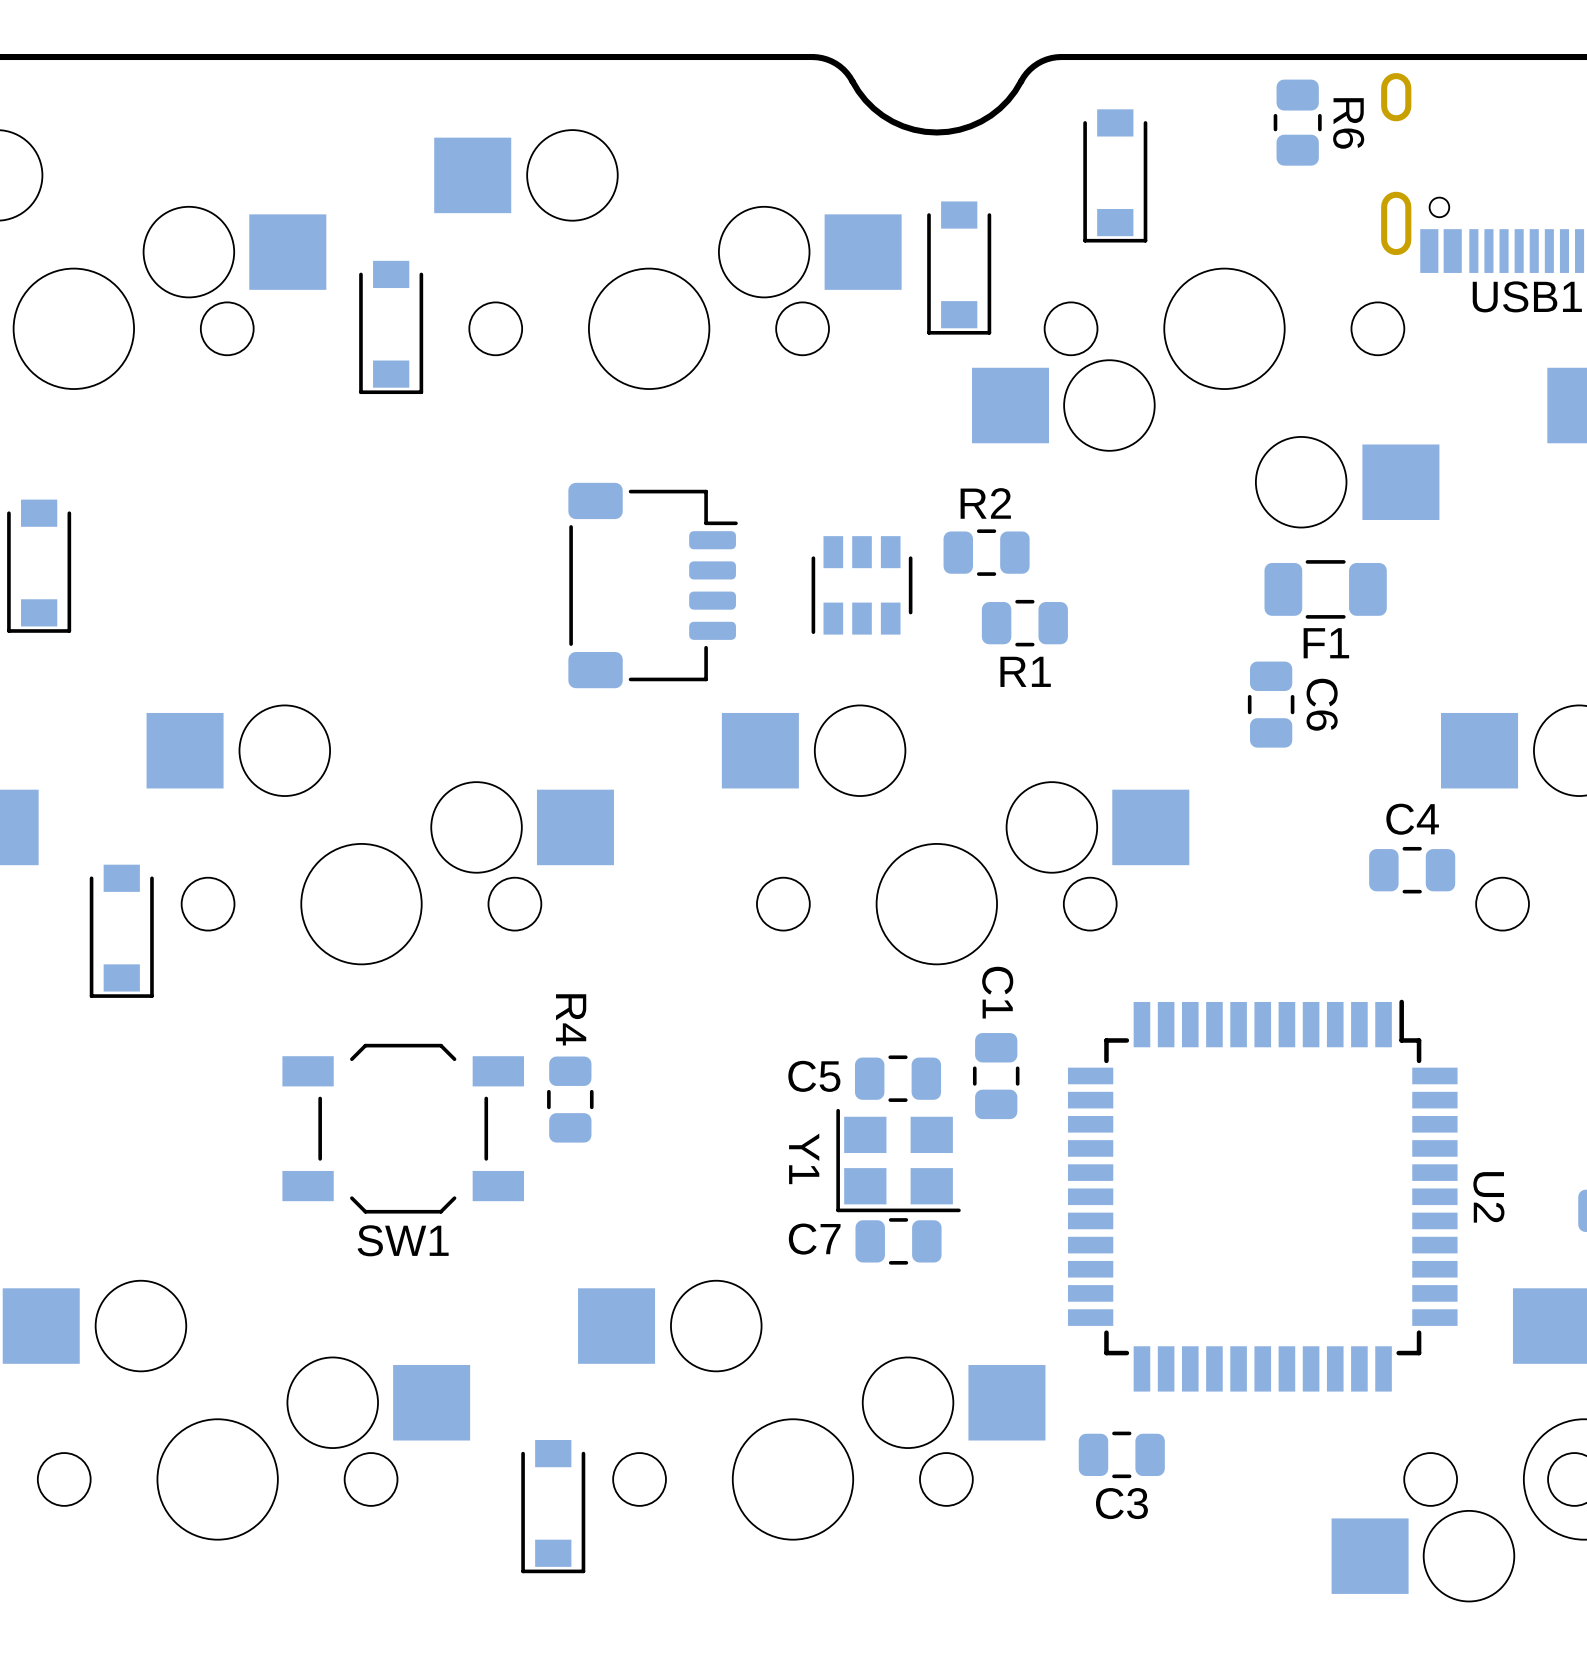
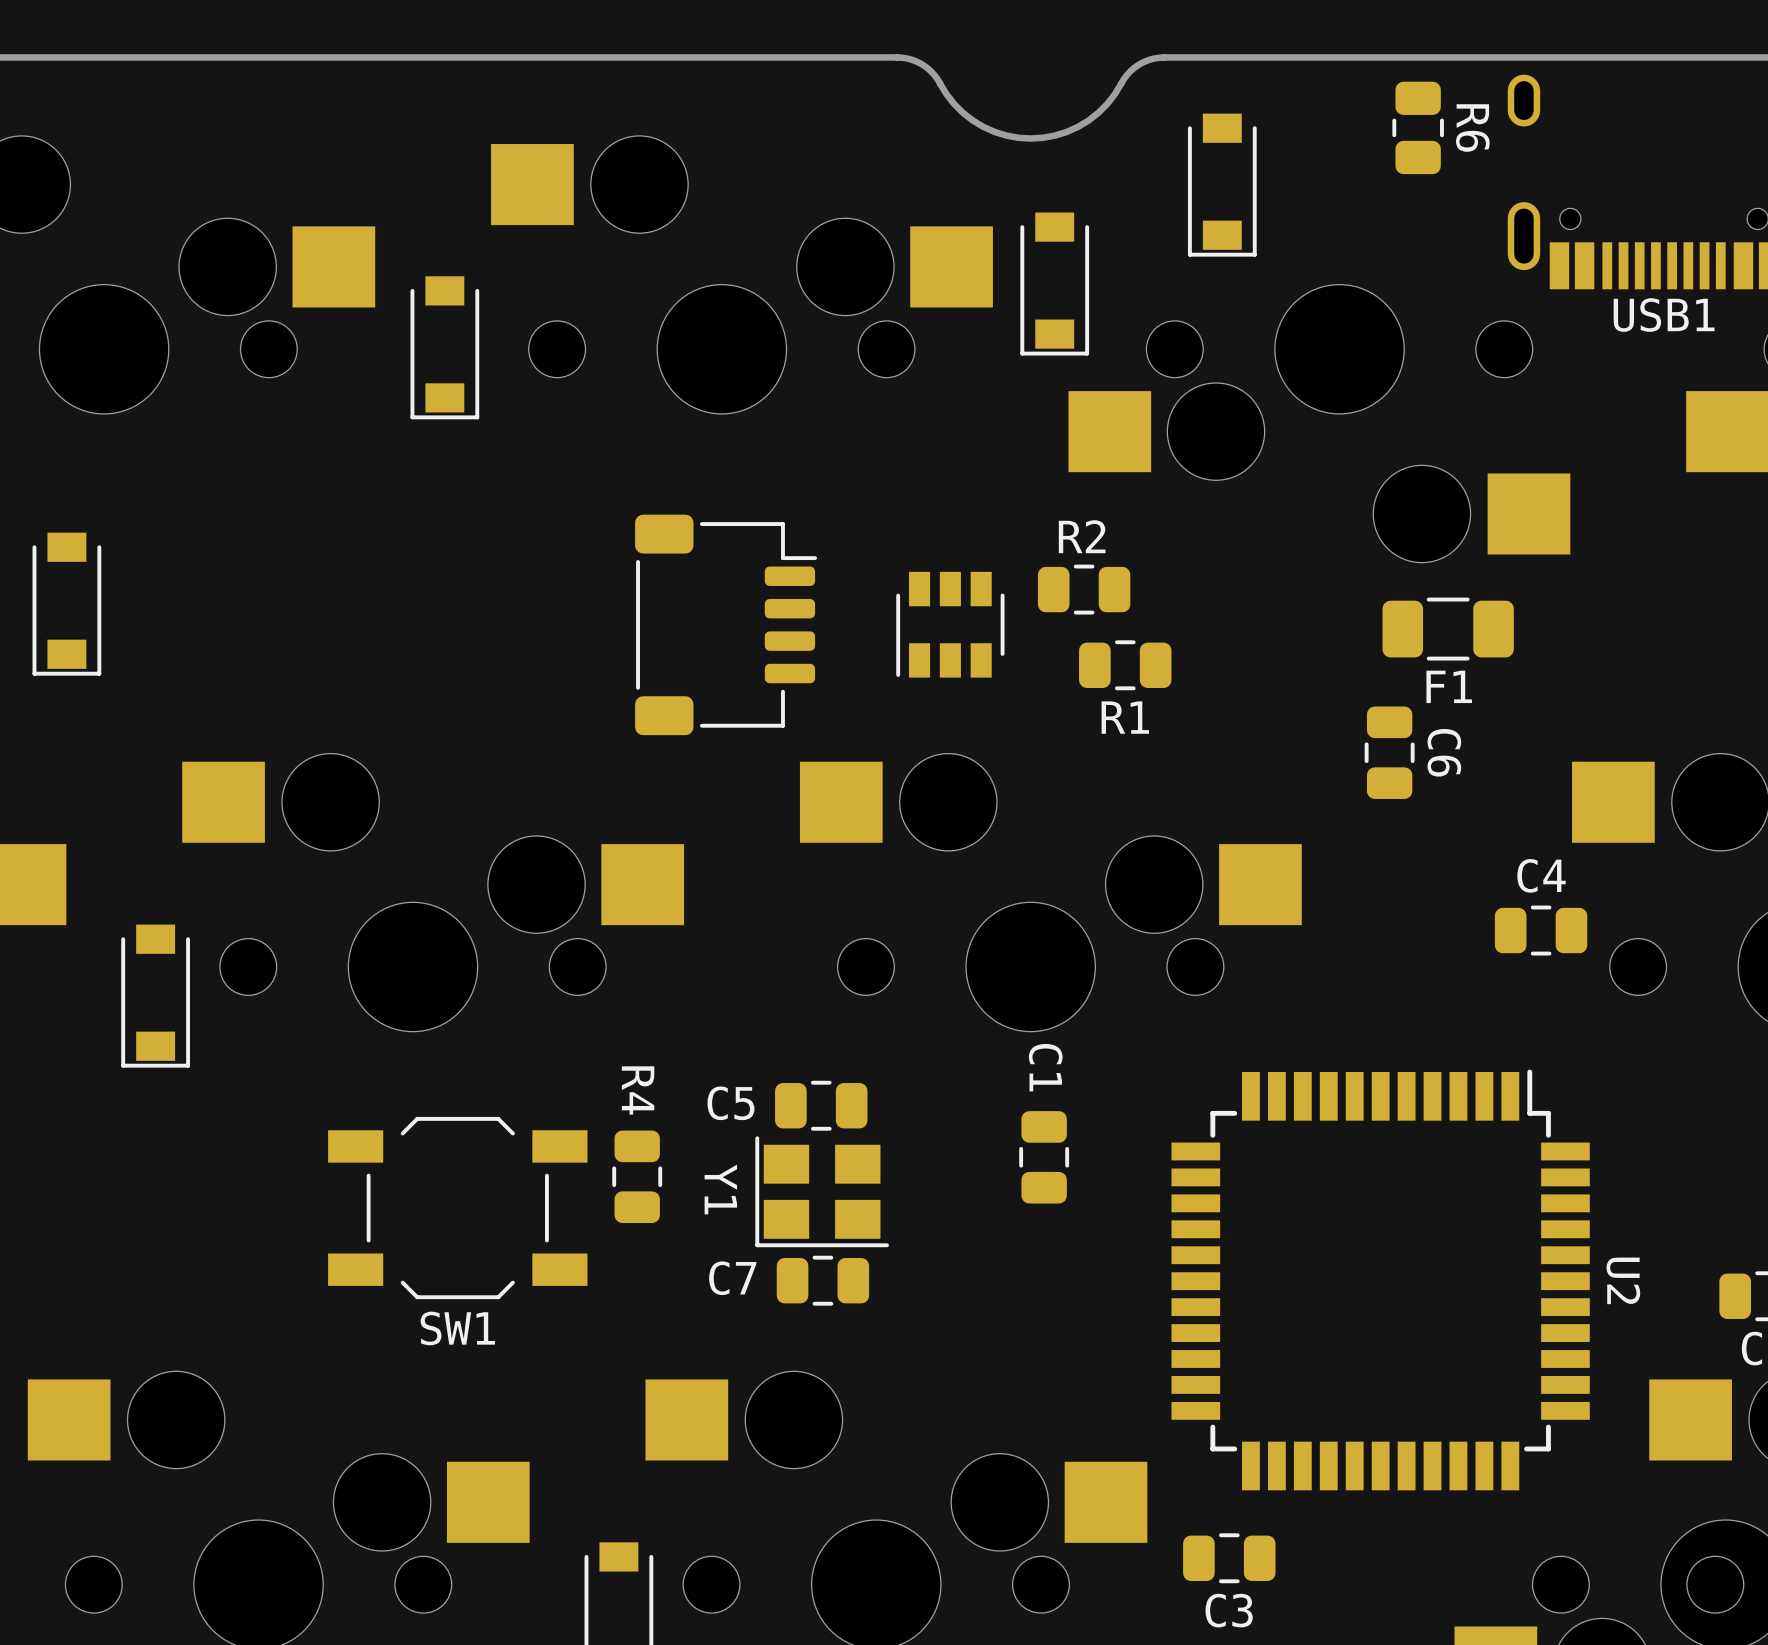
C1 position: (996, 1076) -> (1044, 1157)
C5 position: (898, 1078) -> (821, 1105)
Y1 position: (898, 1160) -> (822, 1191)
C7 position: (898, 1241) -> (822, 1280)

